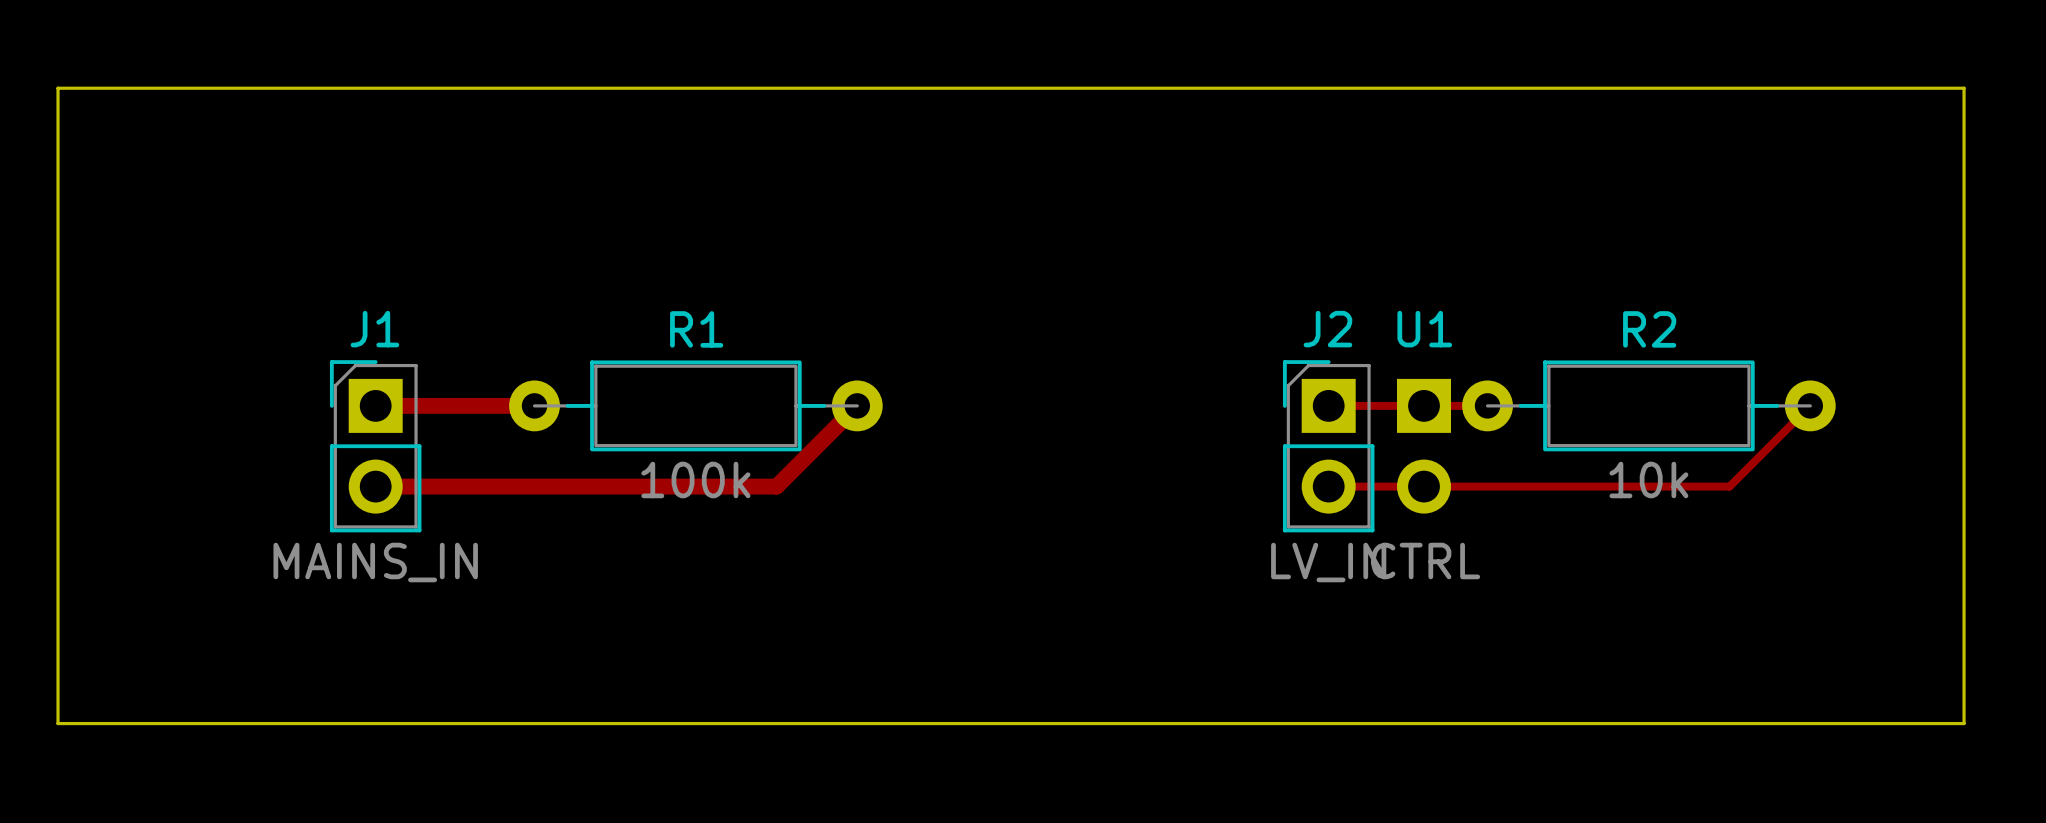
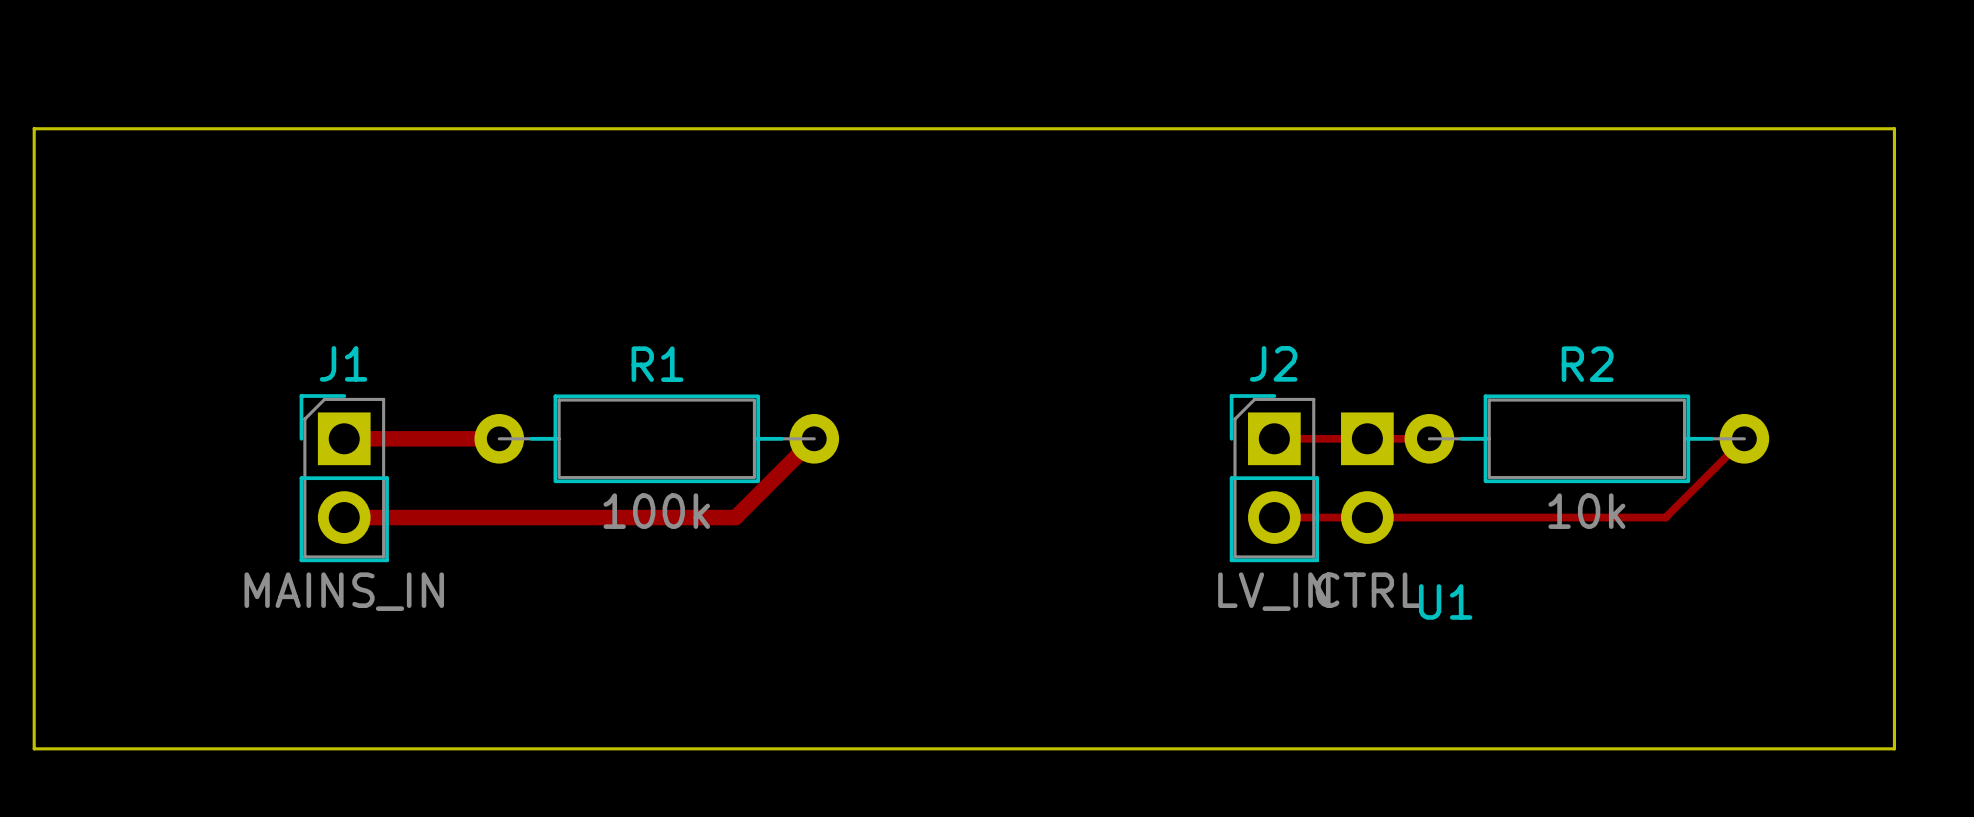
U1 name position: U1 (1424, 329) -> U1 (1445, 601)

